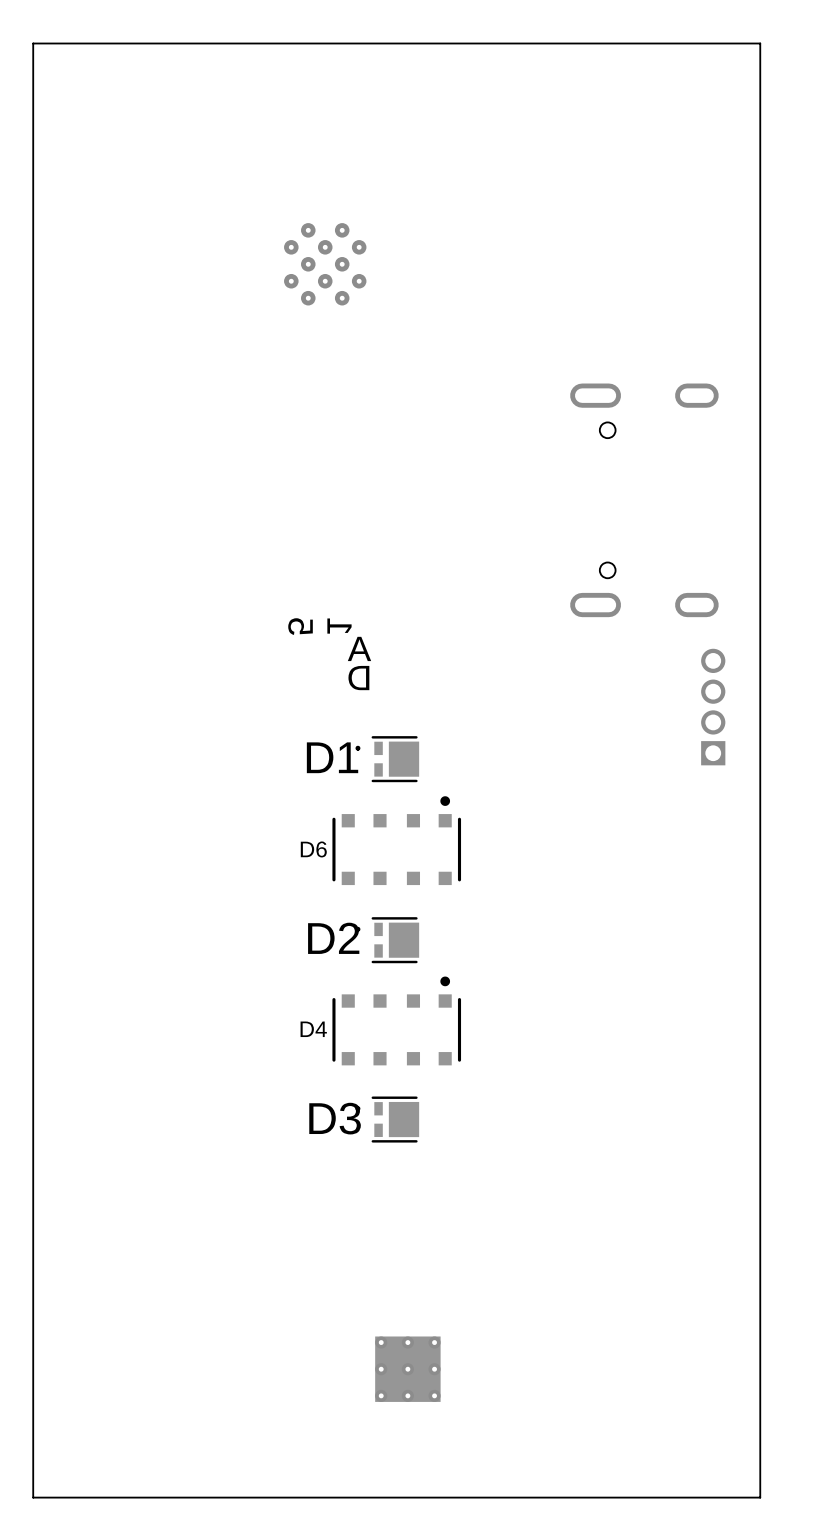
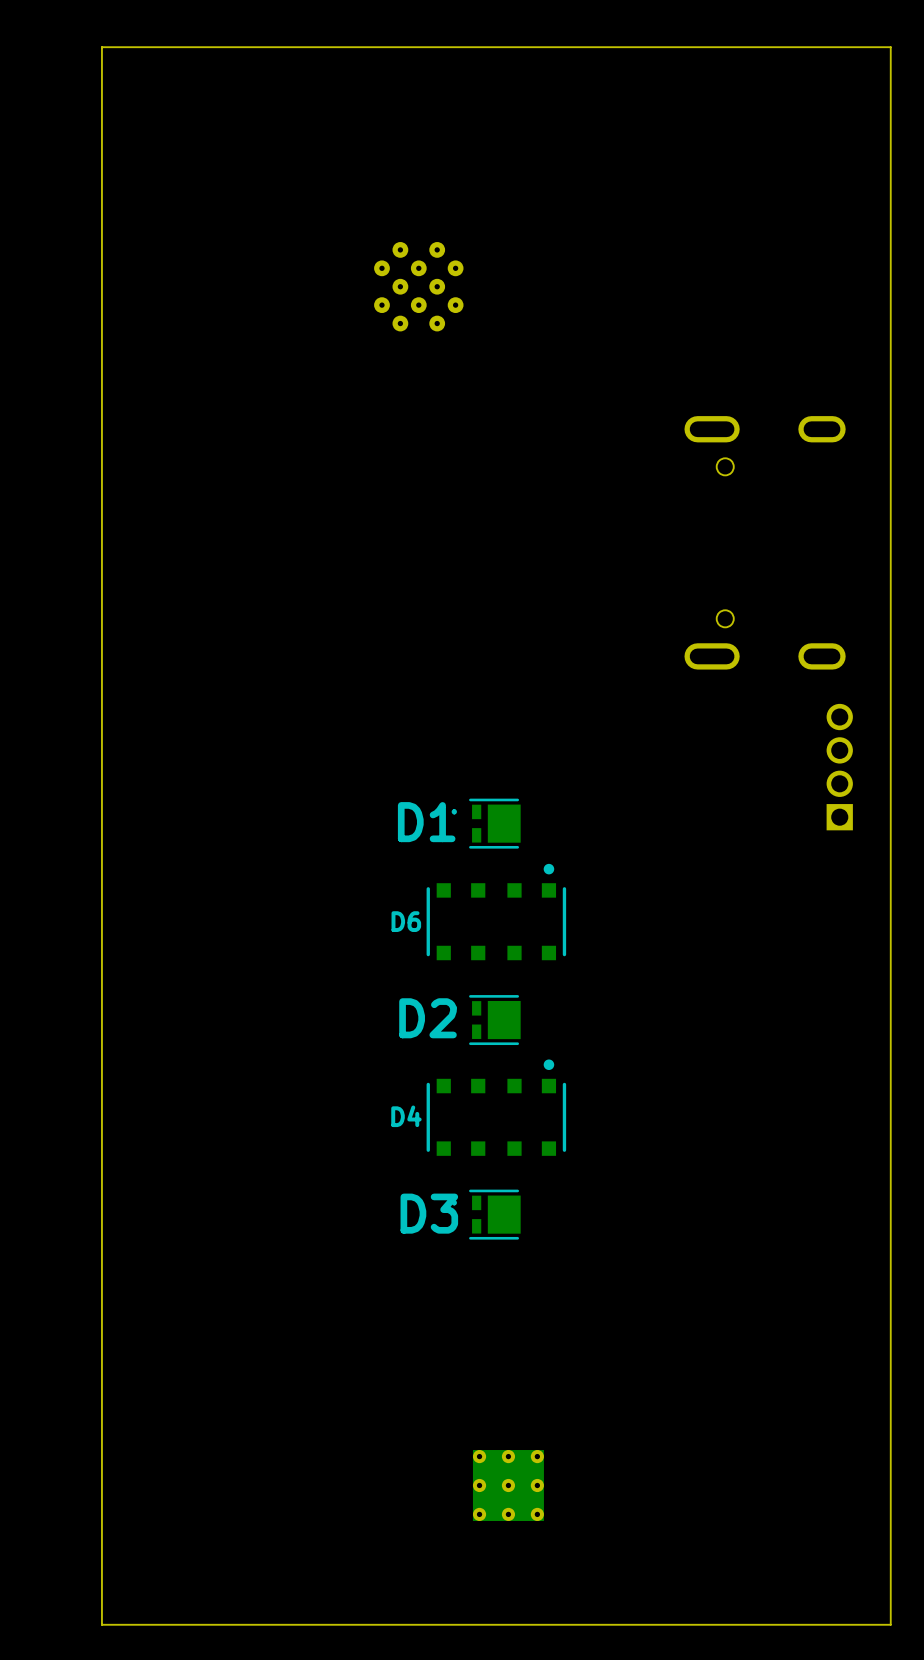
part: (329, 654) -> none

